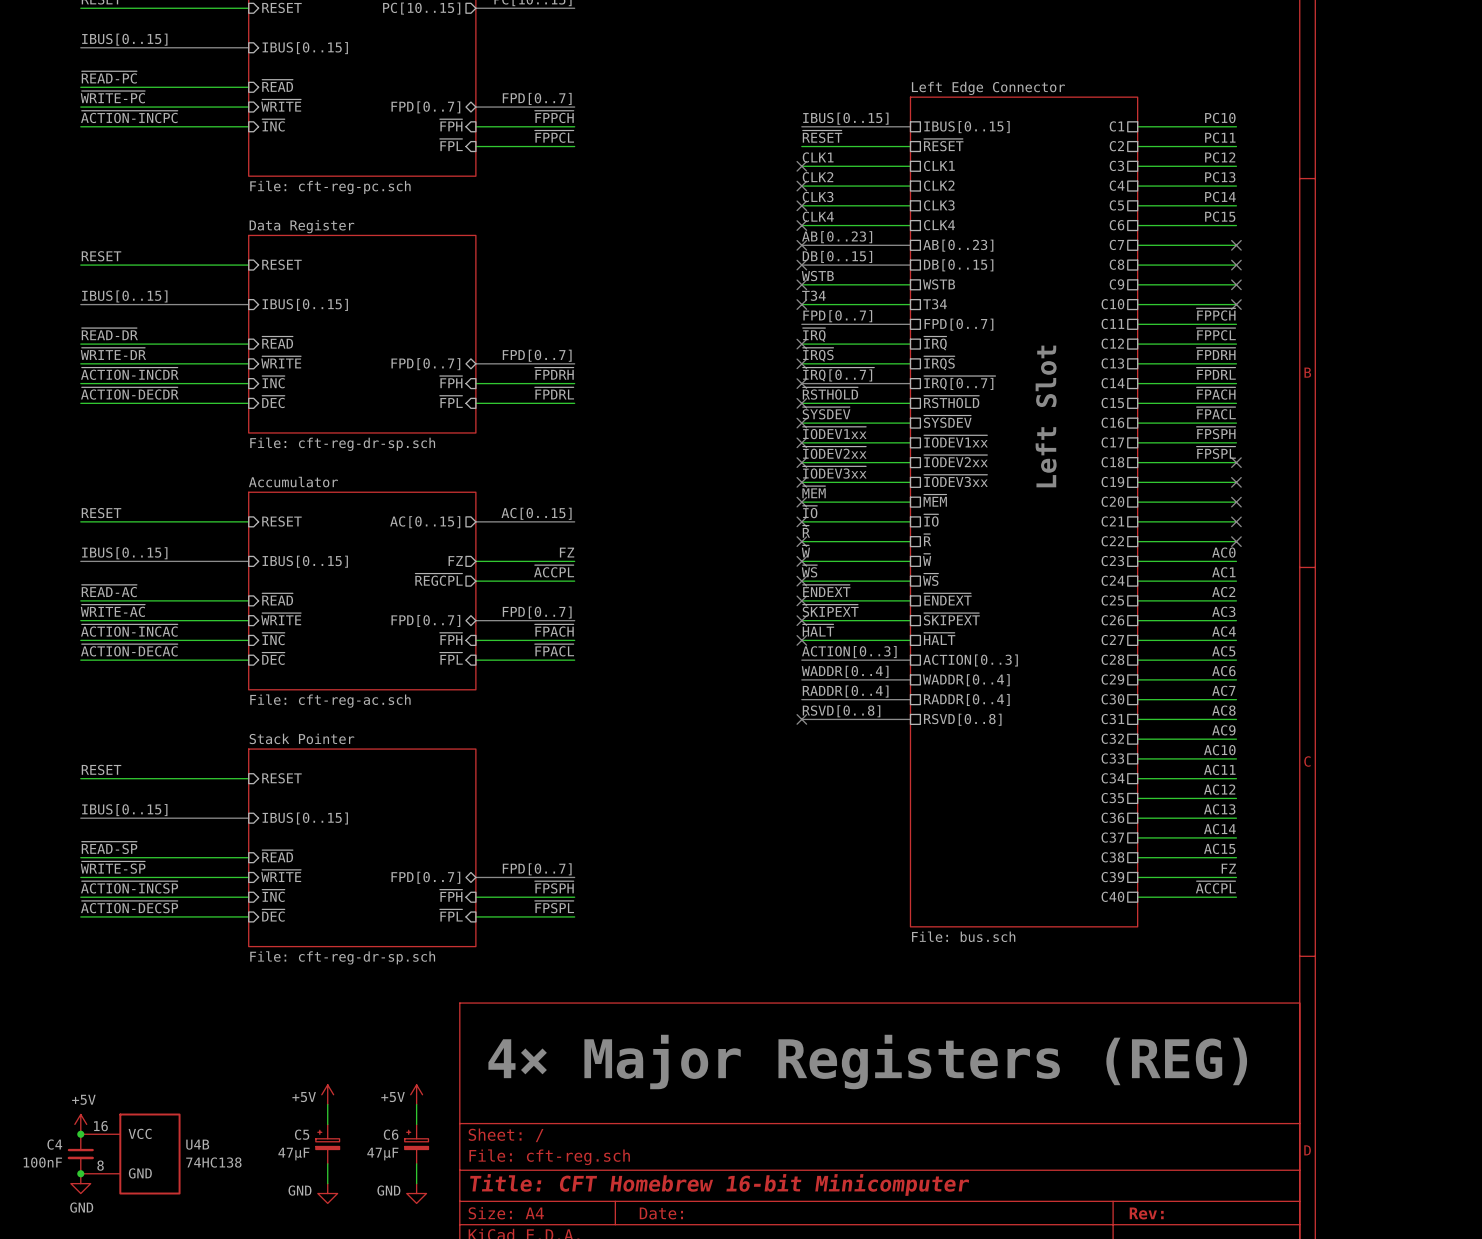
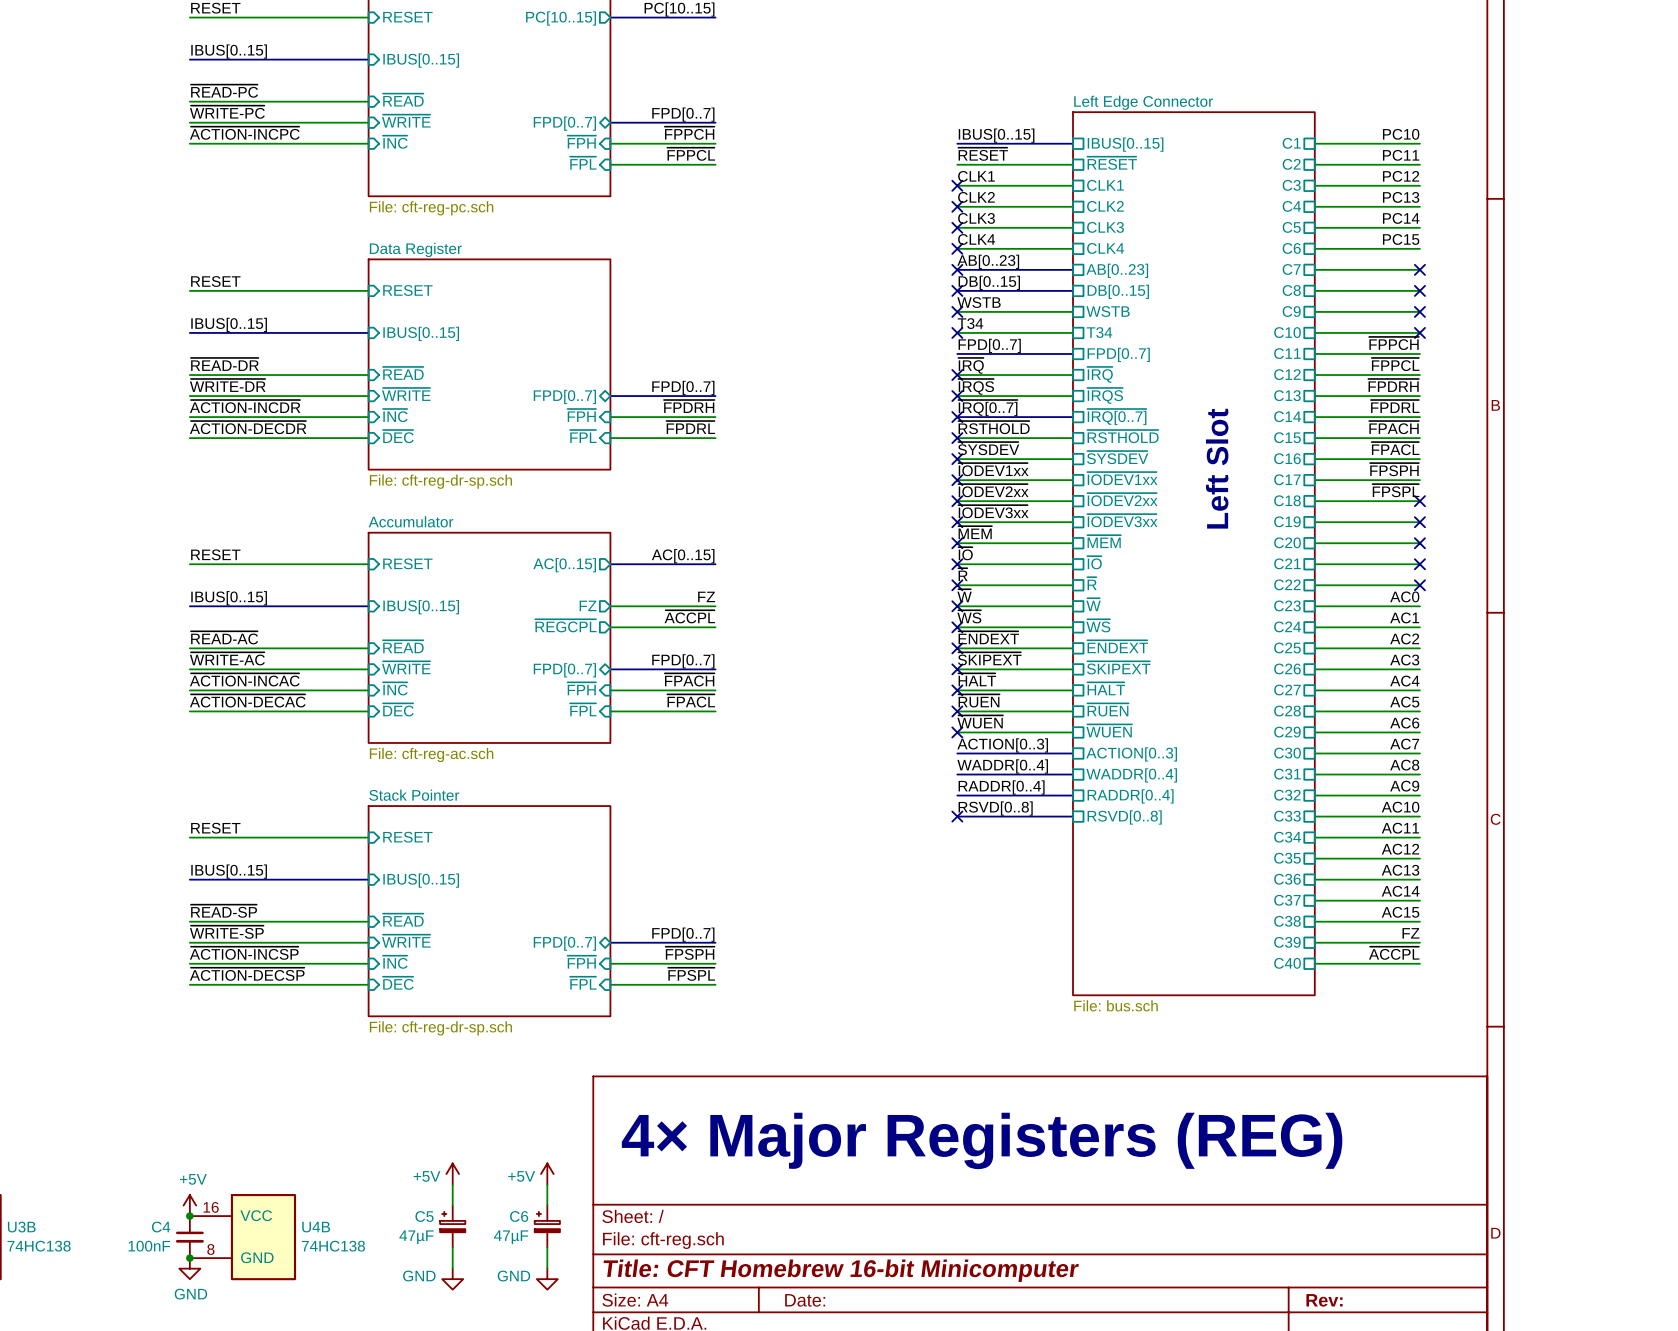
label: ACTION[0..3] (849, 652) -> ~{RUEN} (978, 700)
bus: (801, 660) (910, 660) -> (957, 795) (1072, 795)
no-connect mark: none -> (957, 711)
sheet pin: ACTION[0..3] (970, 660) -> ~{RUEN} (1107, 709)
label: WADDR[0..4] (845, 671) -> ~{WUEN} (980, 721)
bus: (801, 679) (910, 679) -> (957, 816) (1072, 816)
no-connect mark: none -> (957, 732)
sheet pin: WADDR[0..4] (966, 680) -> ~{WUEN} (1109, 730)
label: RADDR[0..4] (845, 691) -> ACTION[0..3] (1002, 745)
sheet pin: RADDR[0..4] (966, 699) -> ACTION[0..3] (1131, 754)
label: RSVD[0..8] (841, 711) -> WADDR[0..4] (1002, 766)
no-connect mark: (801, 719) -> none
sheet pin: RSVD[0..8] (962, 719) -> WADDR[0..4] (1131, 775)
label: none -> RADDR[0..4] (1001, 787)
sheet pin: none -> RADDR[0..4] (1130, 796)
label: none -> RSVD[0..8] (995, 808)
no-connect mark: none -> (957, 816)
sheet pin: none -> RSVD[0..8] (1124, 817)

